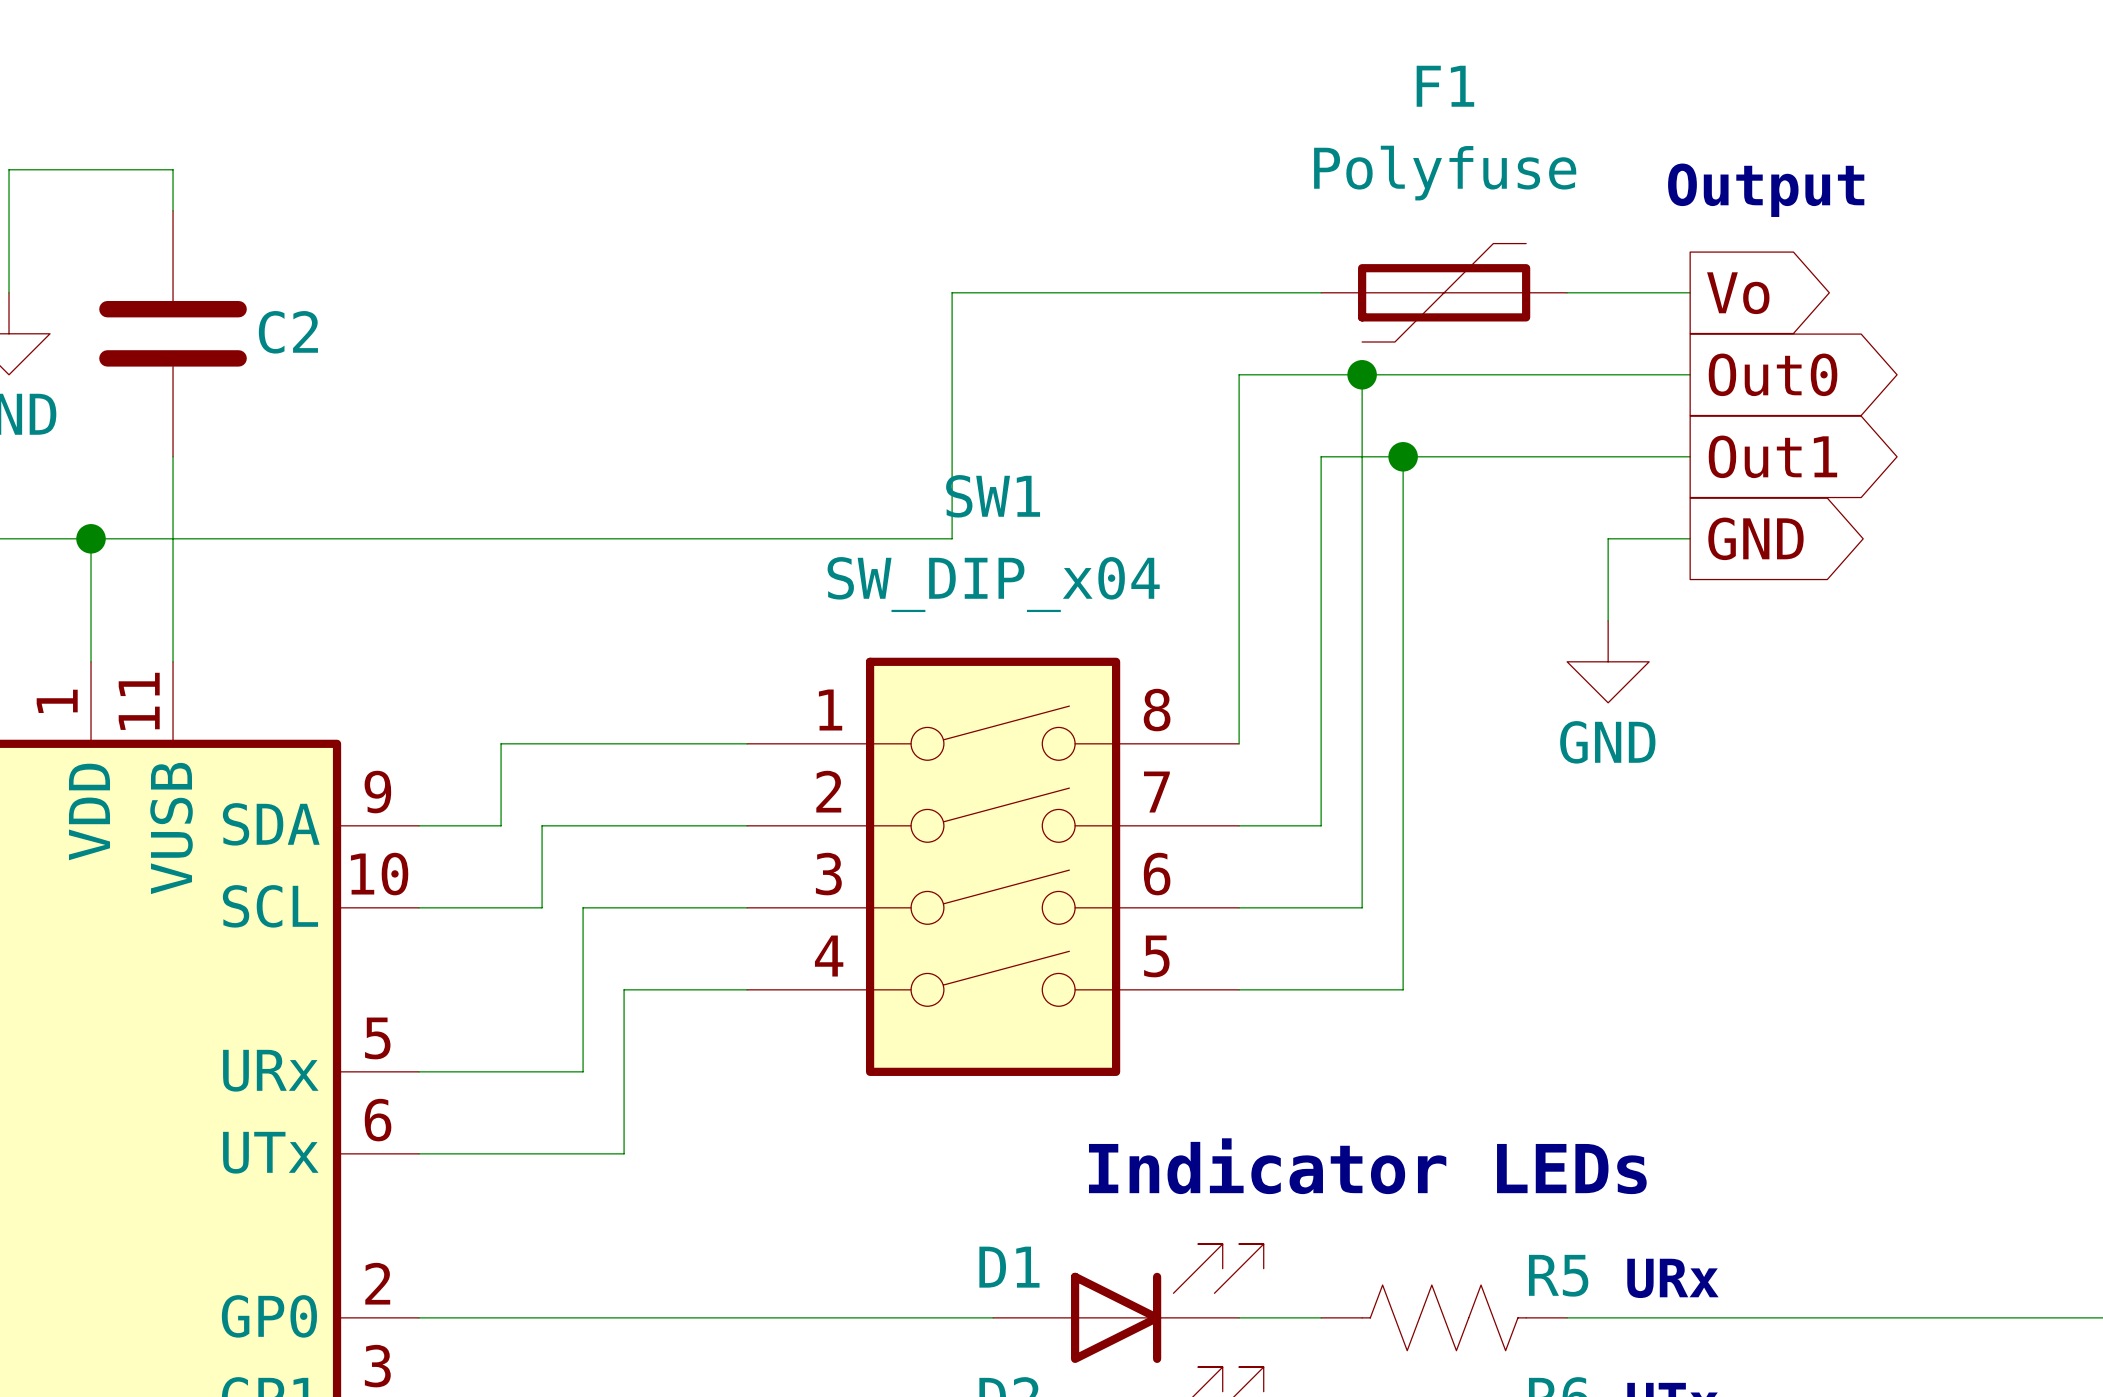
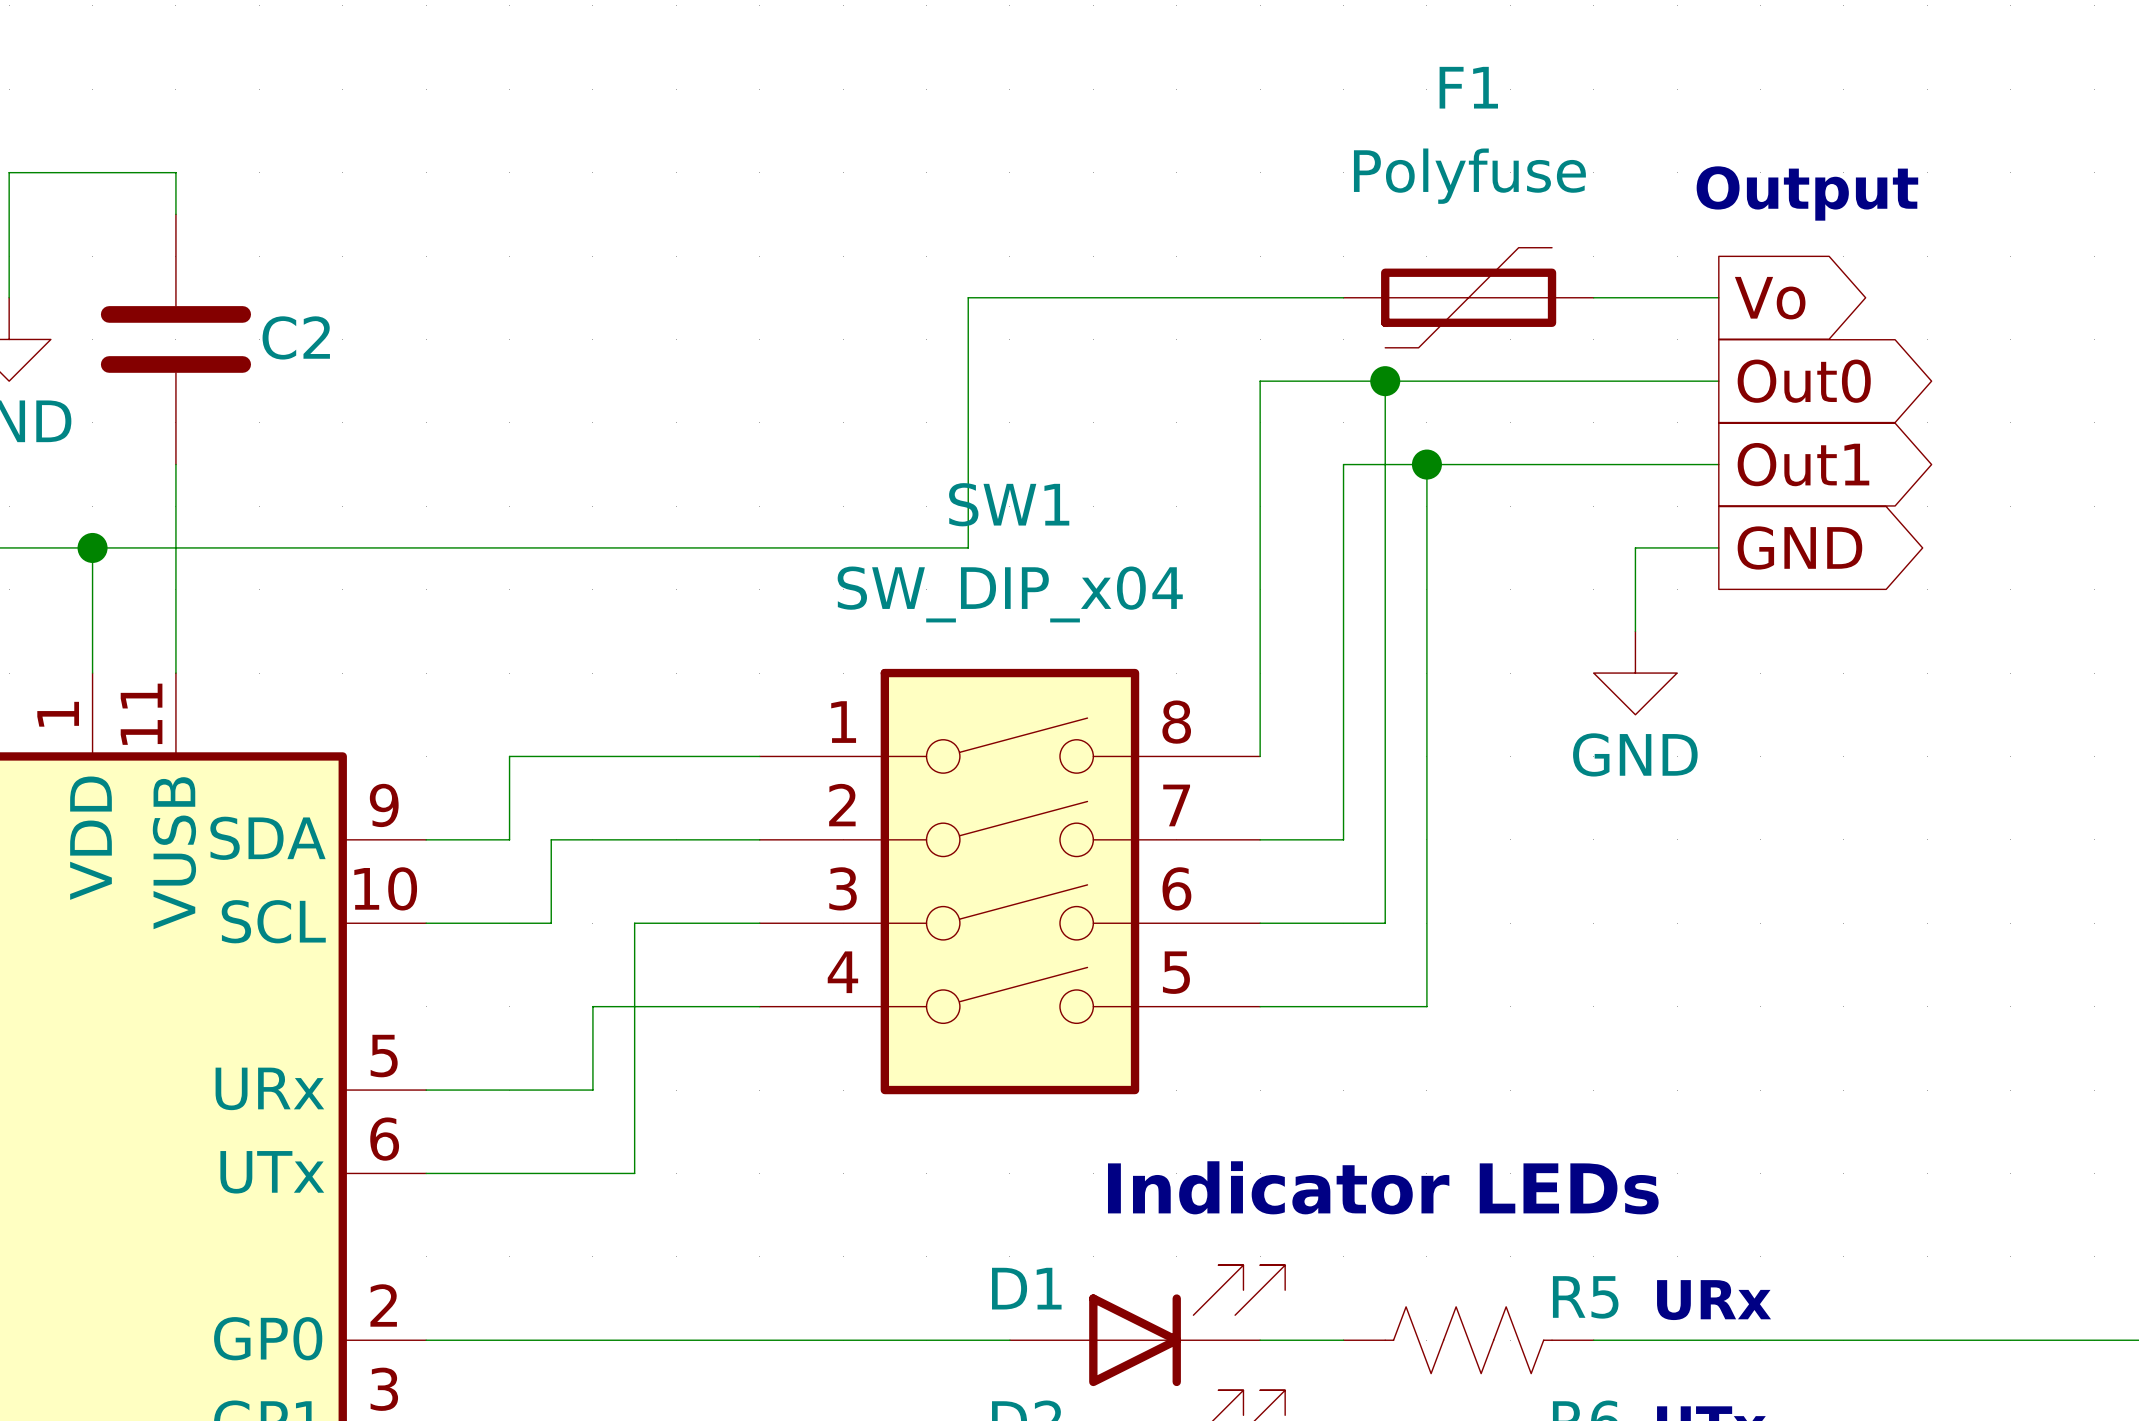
wire: (624, 907) (583, 907) (583, 989) -> (634, 923) (634, 1006) (592, 1006)

